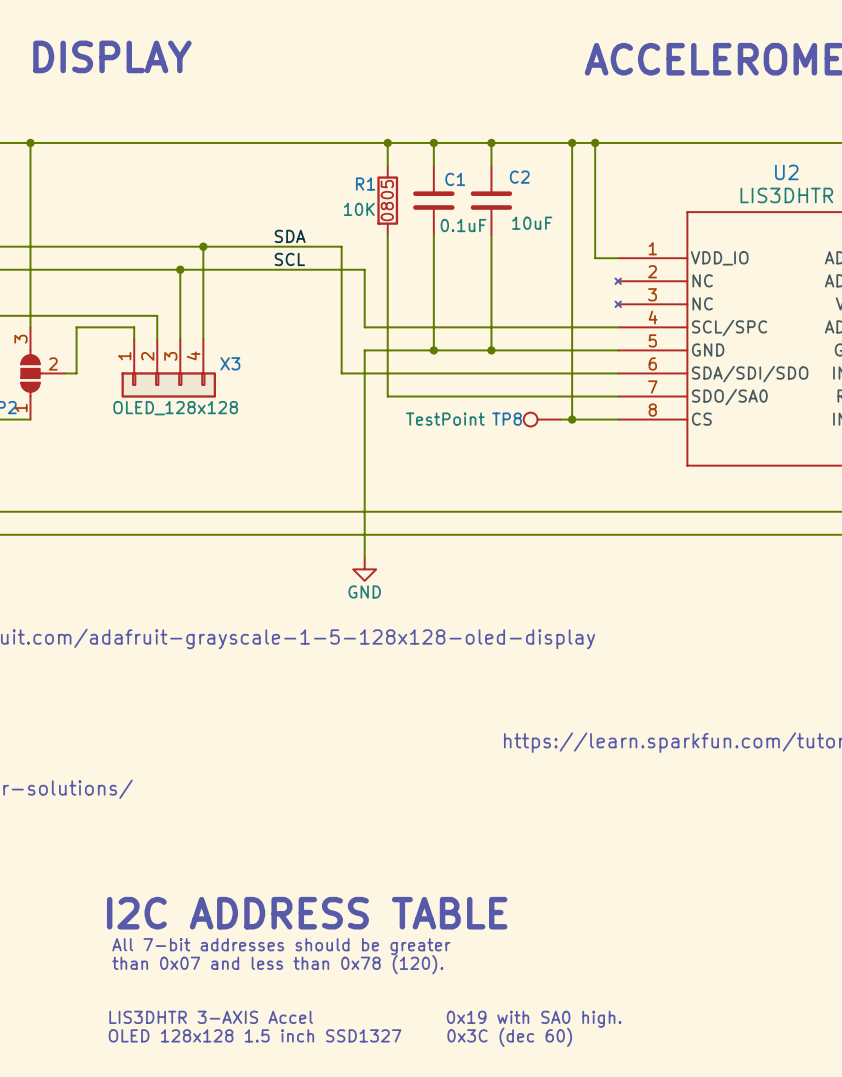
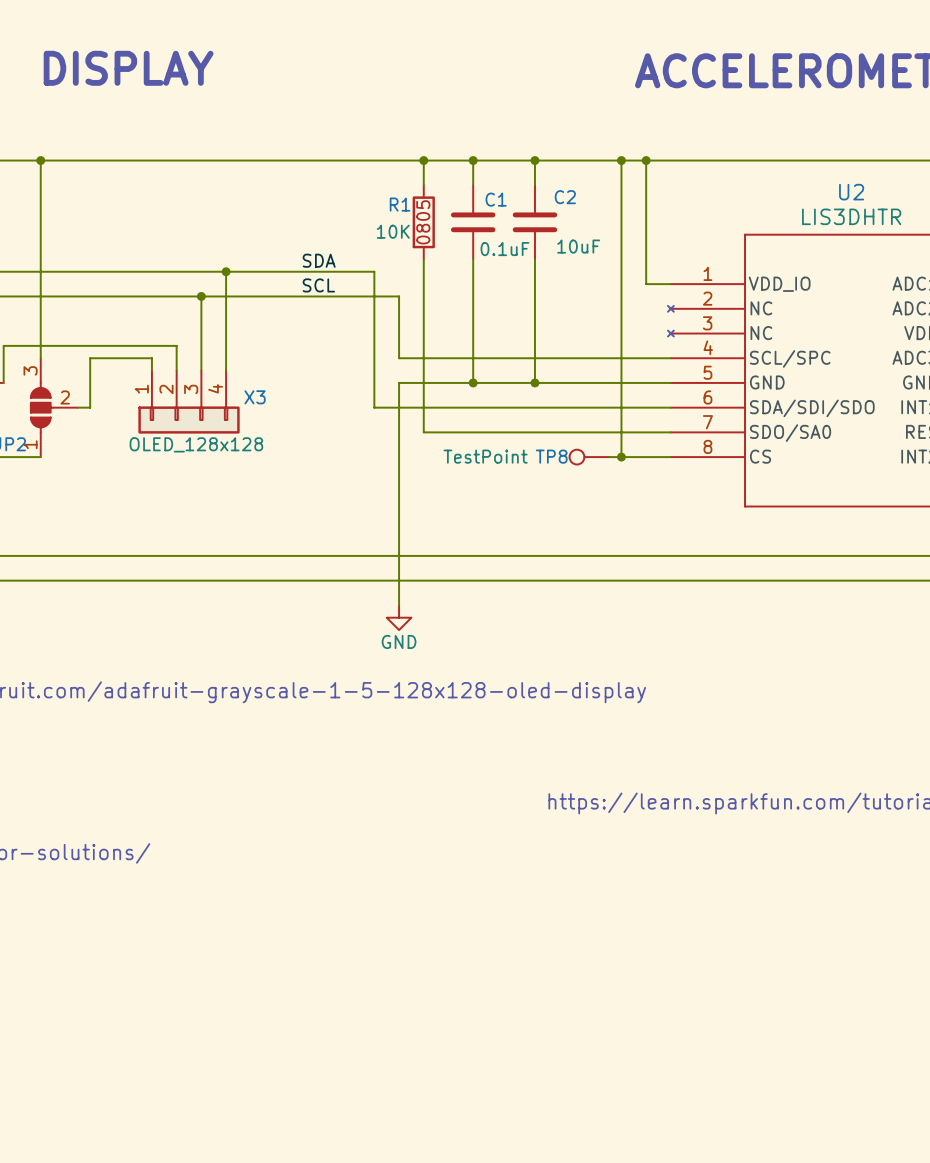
text: I2C ADDRESS TABLE (307, 913) -> none
text: All 7-bit addresses should be greater (281, 946) -> none
text: than 0x07 and less than 0x78 (120). (277, 964) -> none
text: LIS3DHTR 3-AXIS Accel 0x19 with SA0 high. (365, 1019) -> none
text: OLED 128x128 1.5 inch SSD1327 0x3C (dec 60) (340, 1037) -> none

